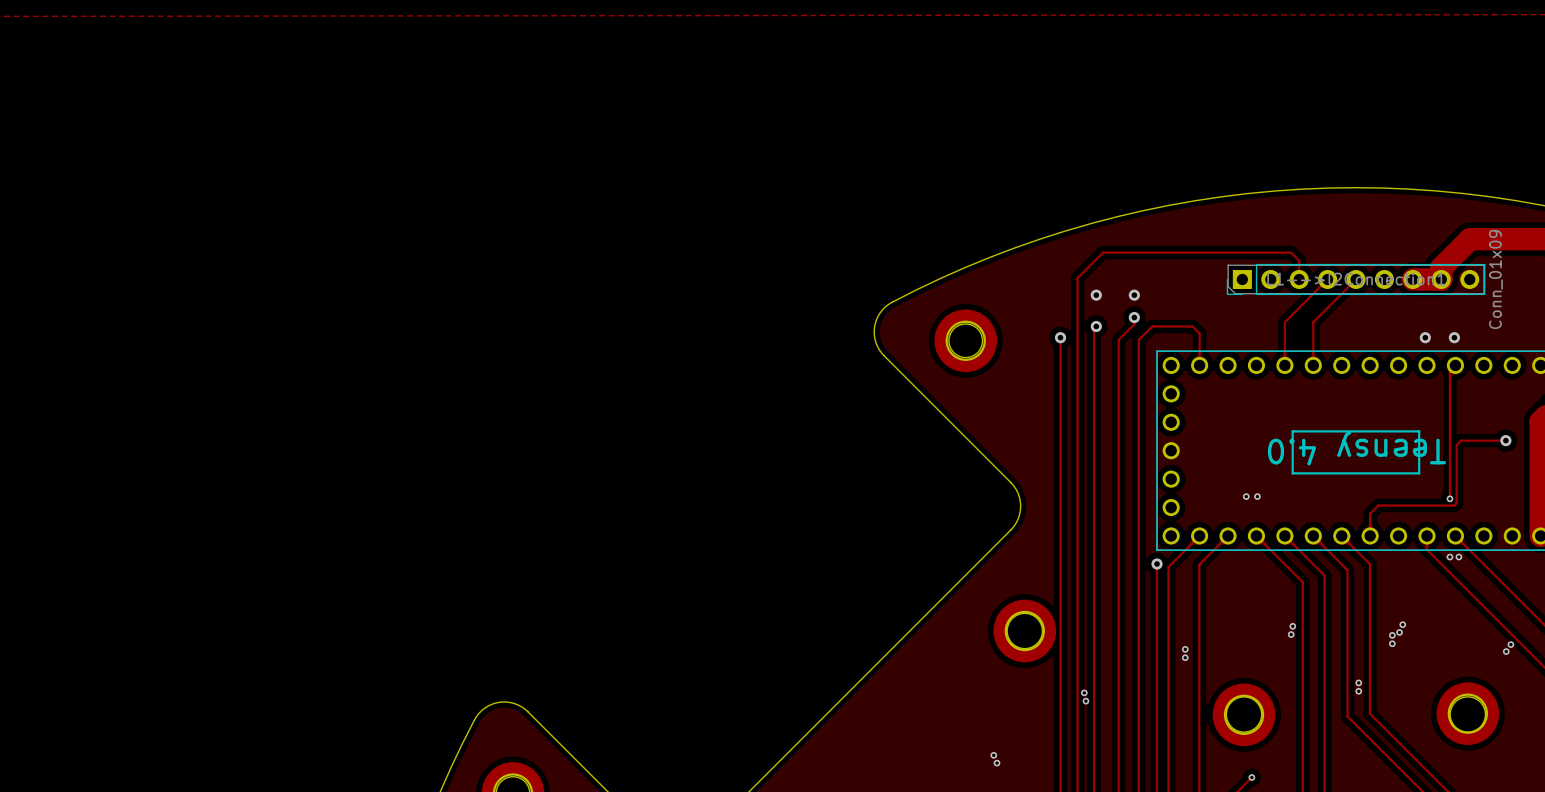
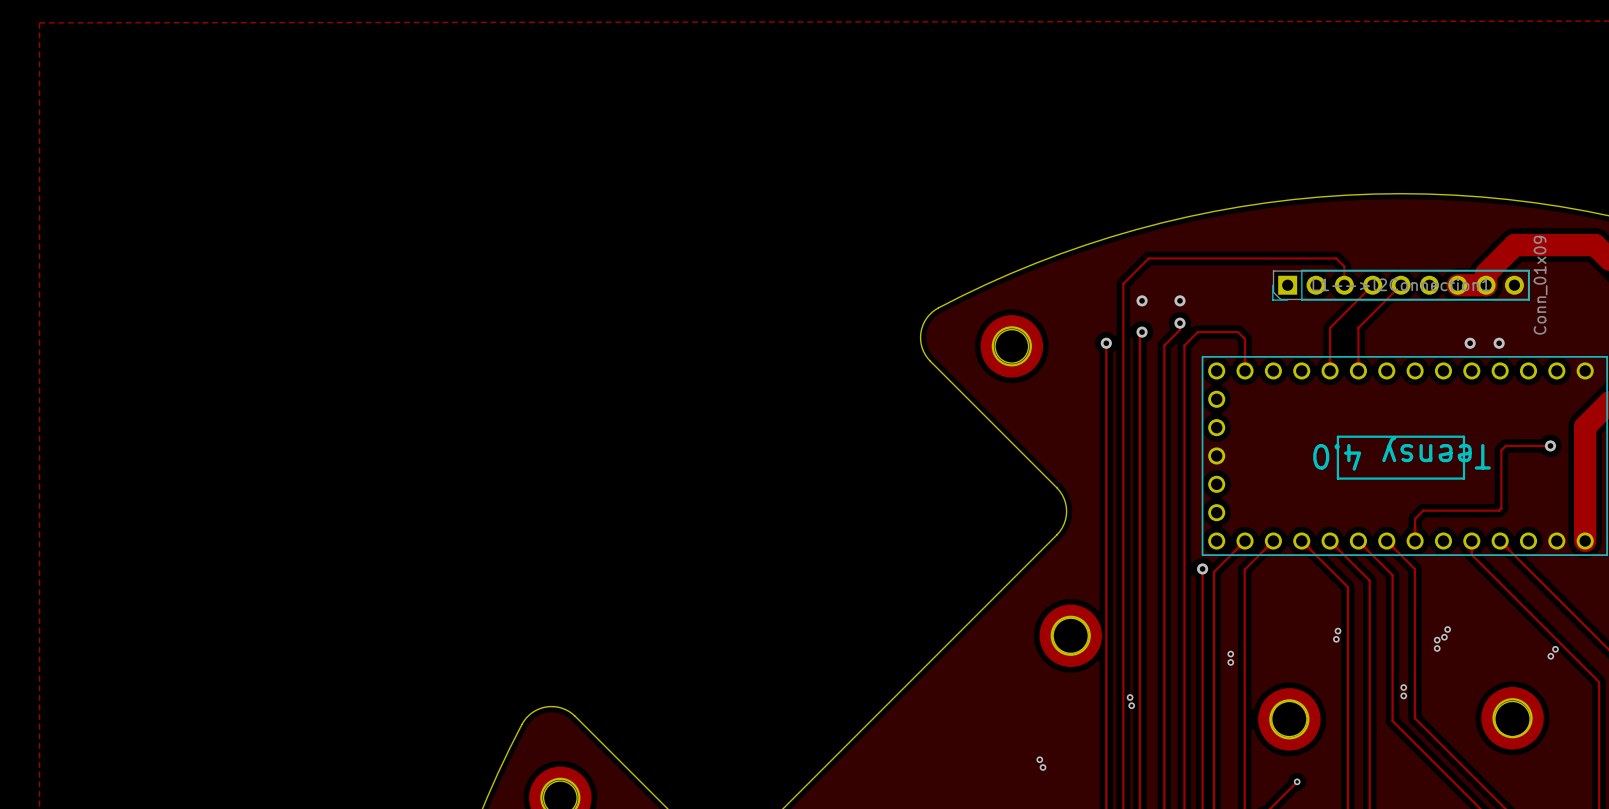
track: (1455, 365) (1449, 370) (1449, 498) -> none
via: (1246, 496) -> none
via: (1257, 496) -> none
via: (1449, 498) -> none
via: (1449, 557) -> none
via: (1458, 557) -> none

